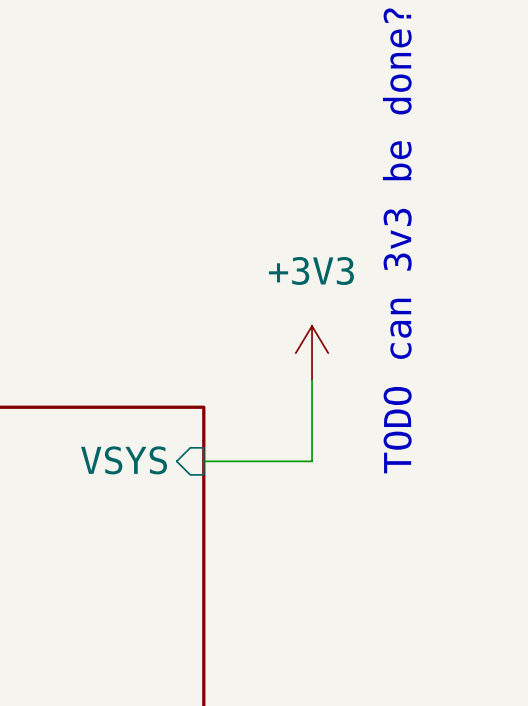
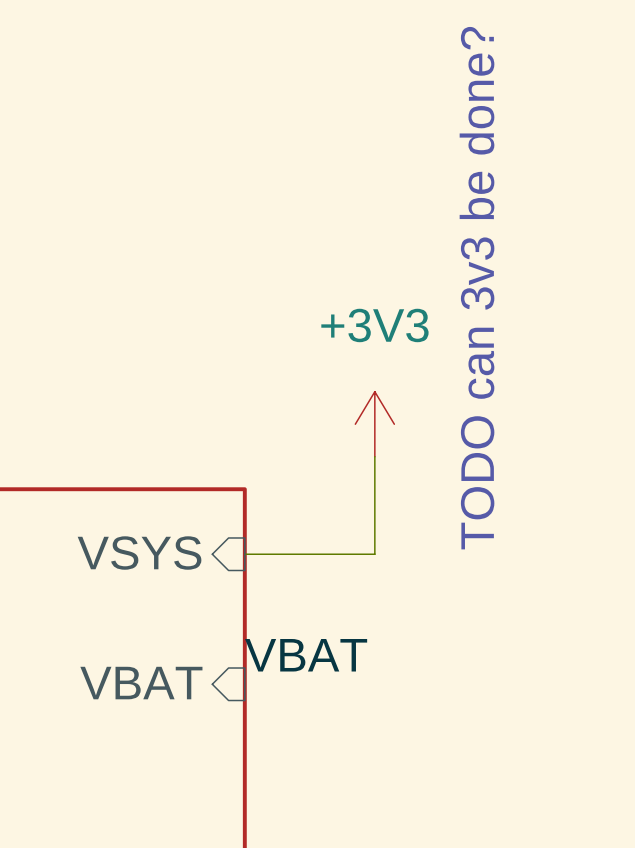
label: none -> VBAT (306, 655)
sheet pin: none -> VBAT (141, 683)

